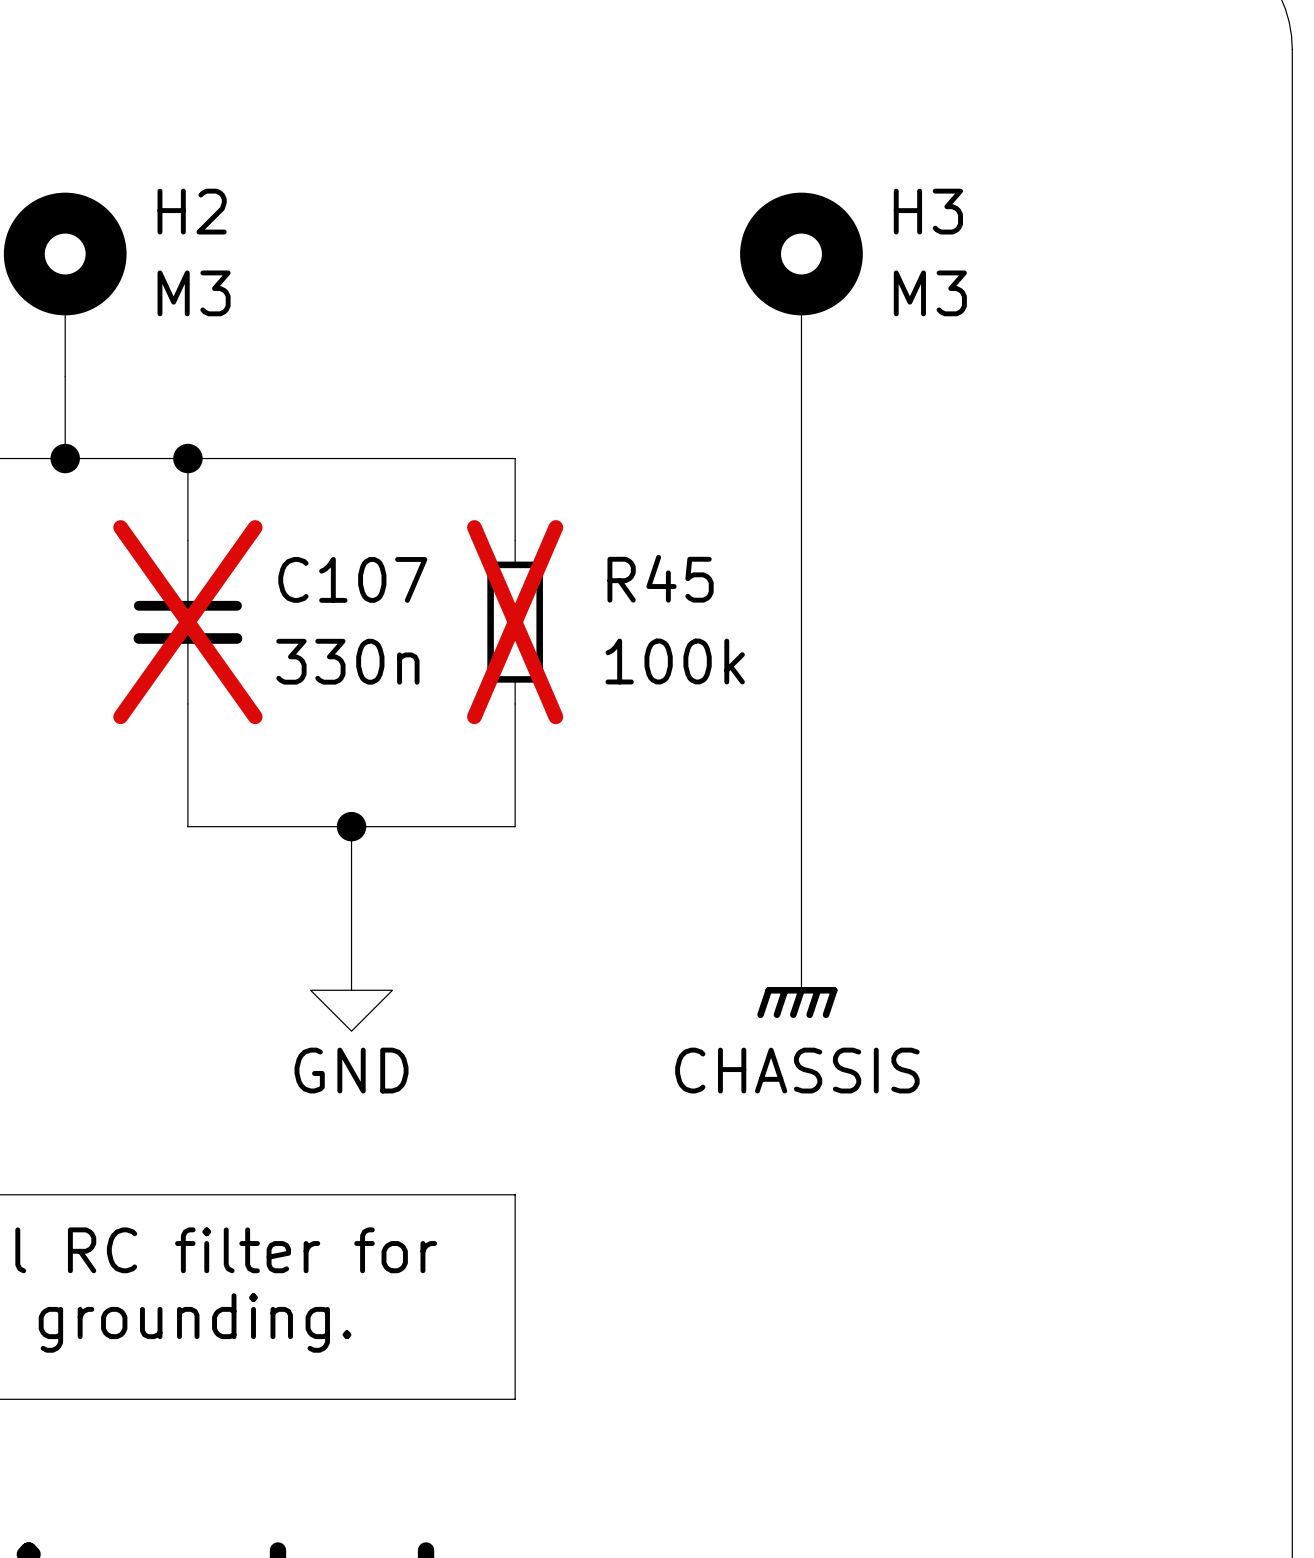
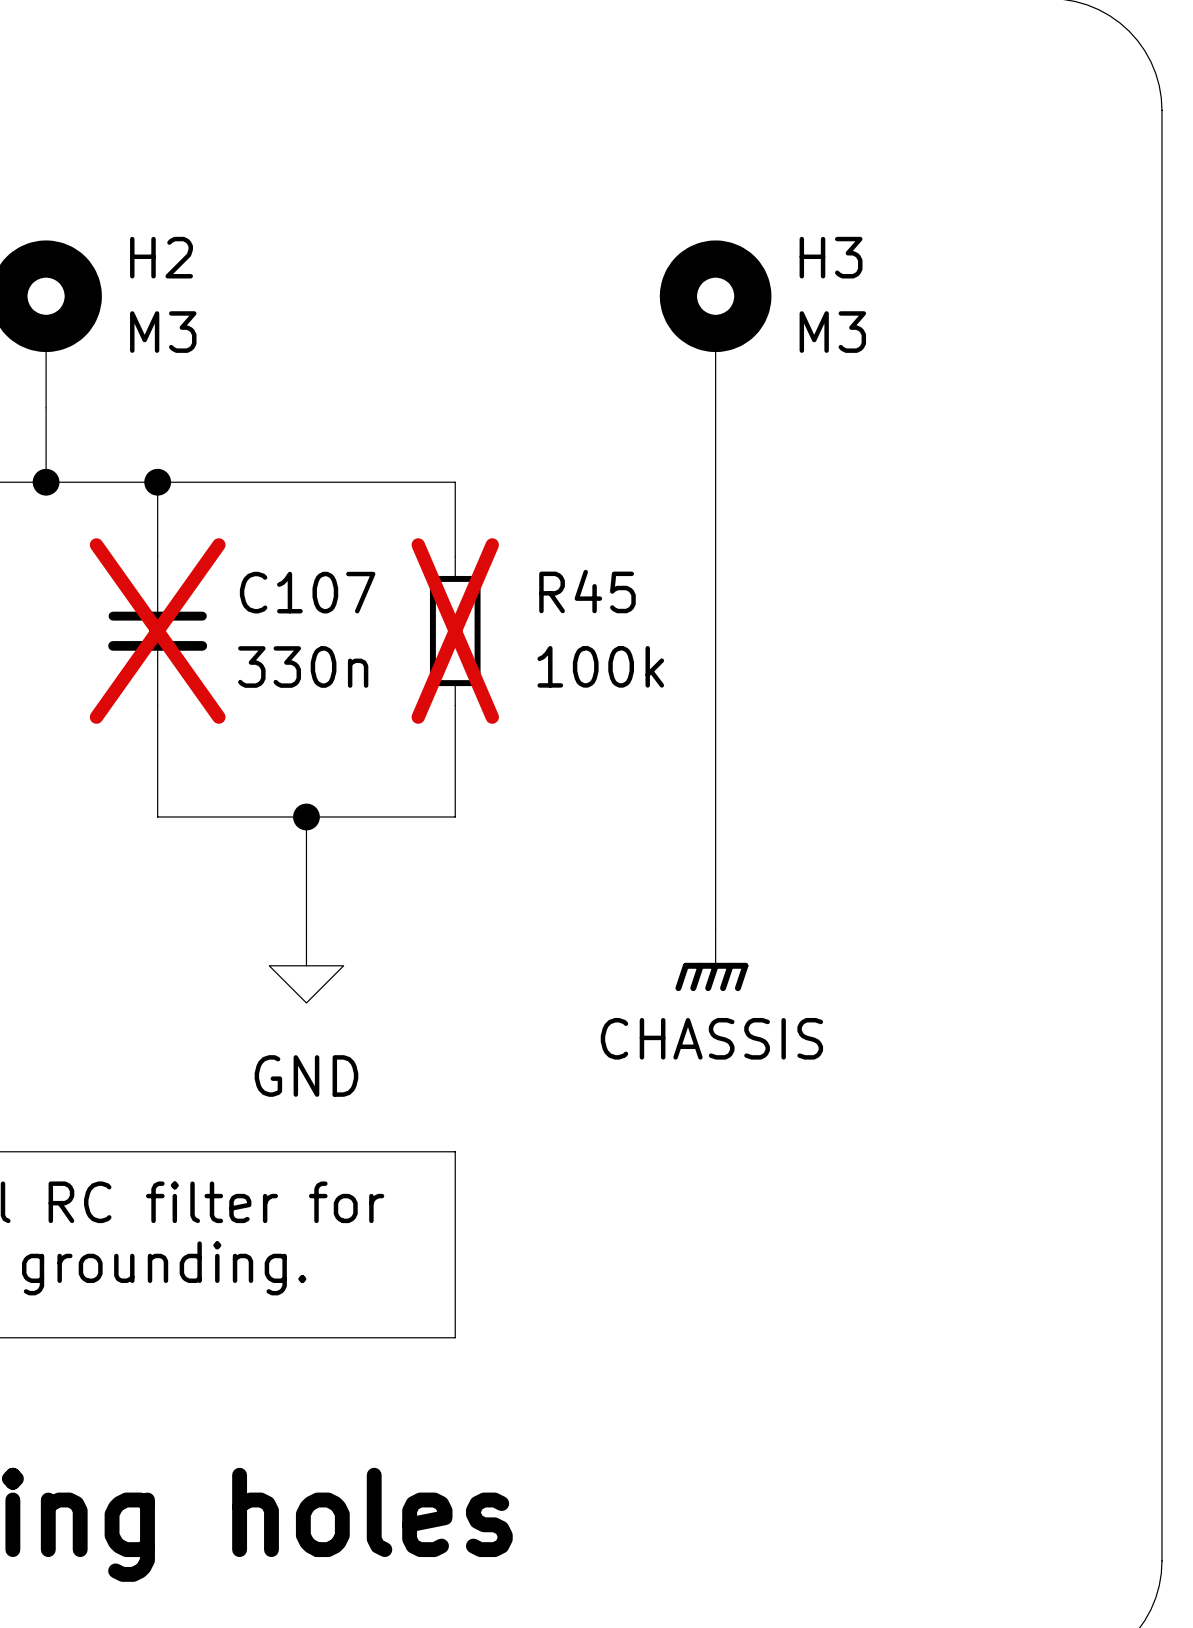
power symbol text position: GND (351, 1070) -> GND (306, 1075)

